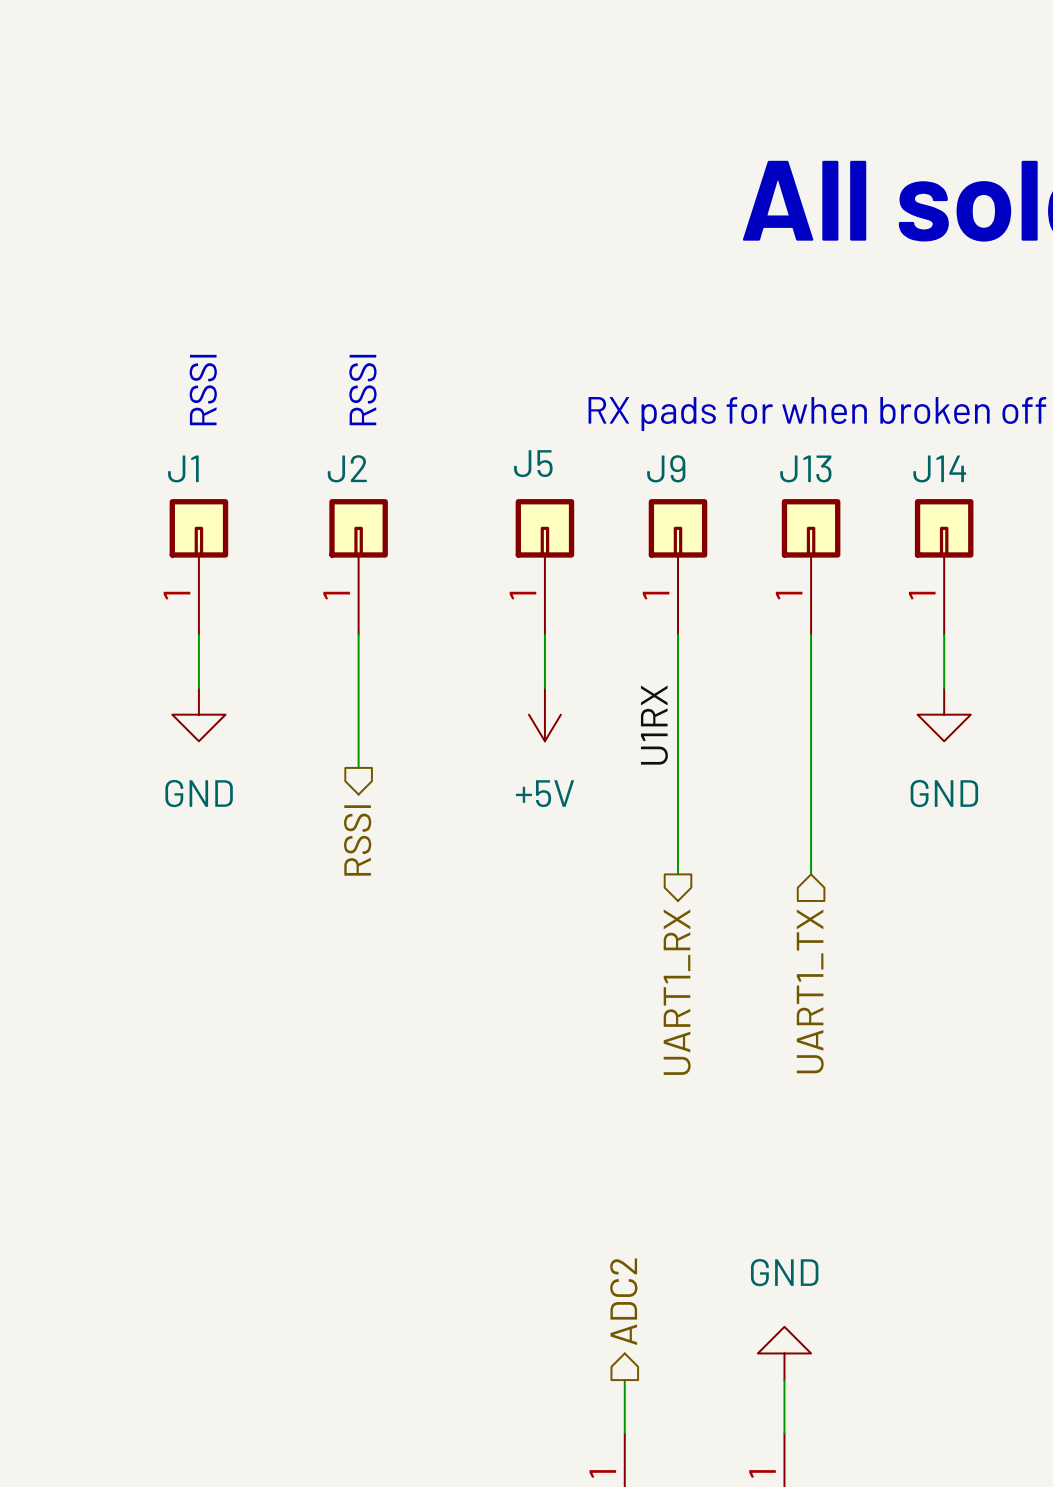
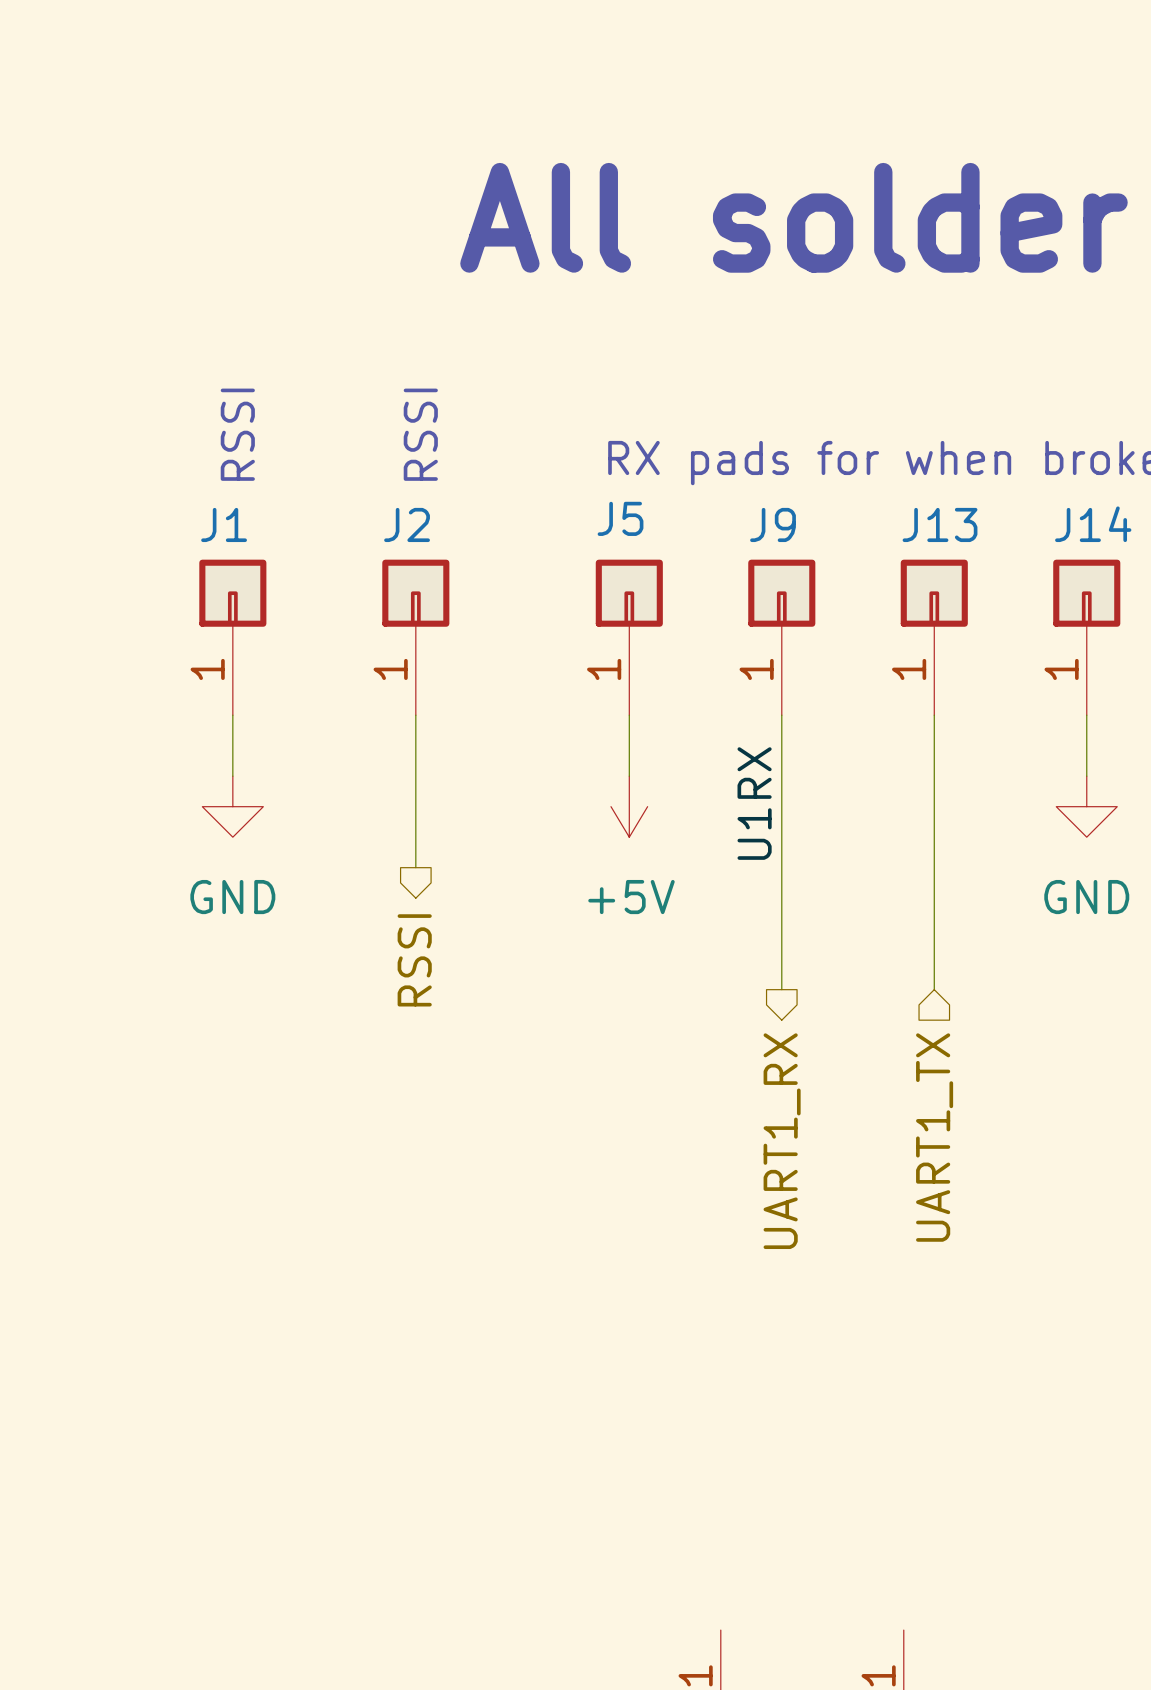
hierarchical label: ADC2 (623, 1301) -> none
power symbol: GND (784, 1353) -> none
wire: (624, 1380) (624, 1433) -> none
wire: (784, 1380) (784, 1433) -> none

